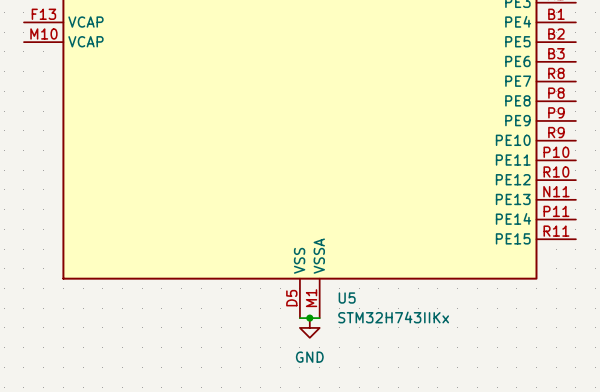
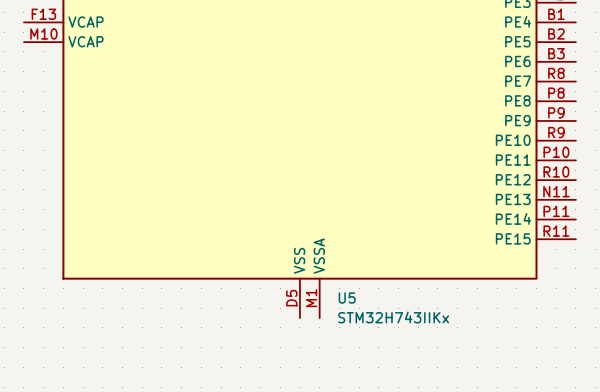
wire: (299, 318) (319, 318) -> none
junction: (309, 318) -> none
power symbol: GND (309, 327) -> none

